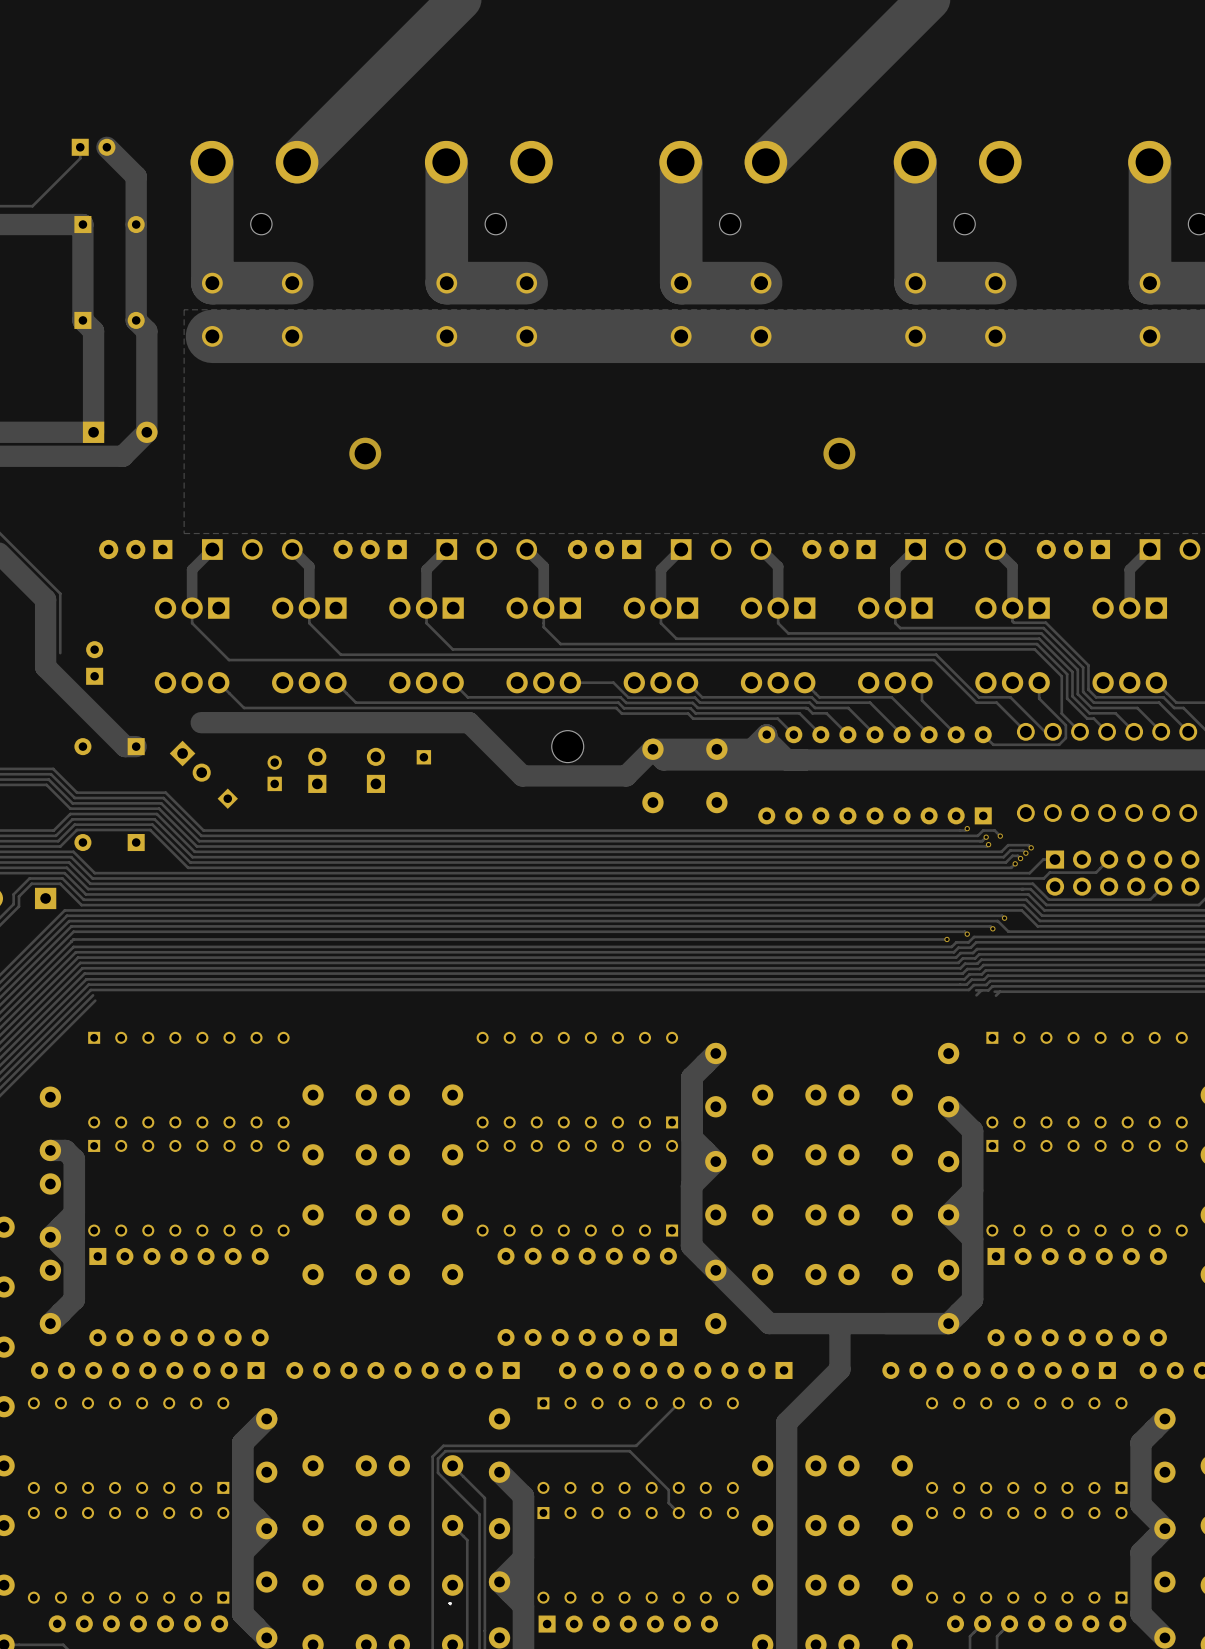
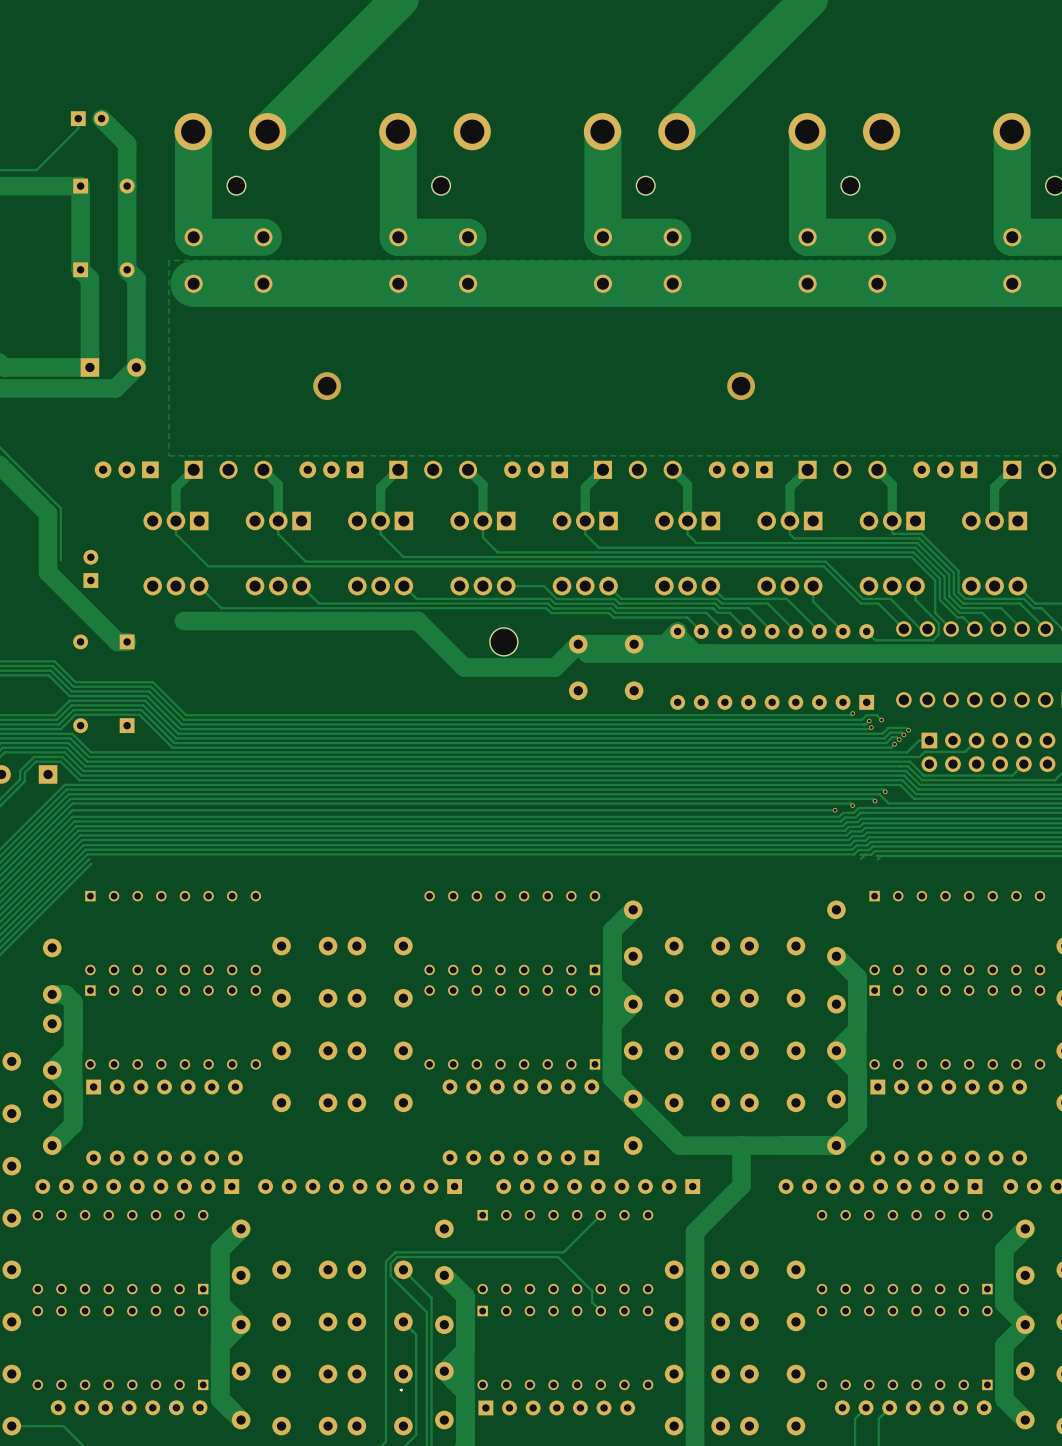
part: (423, 757) -> none
part: (190, 761) -> none
part: (317, 770) -> none
part: (375, 770) -> none
part: (274, 773) -> none
part: (227, 798) -> none

